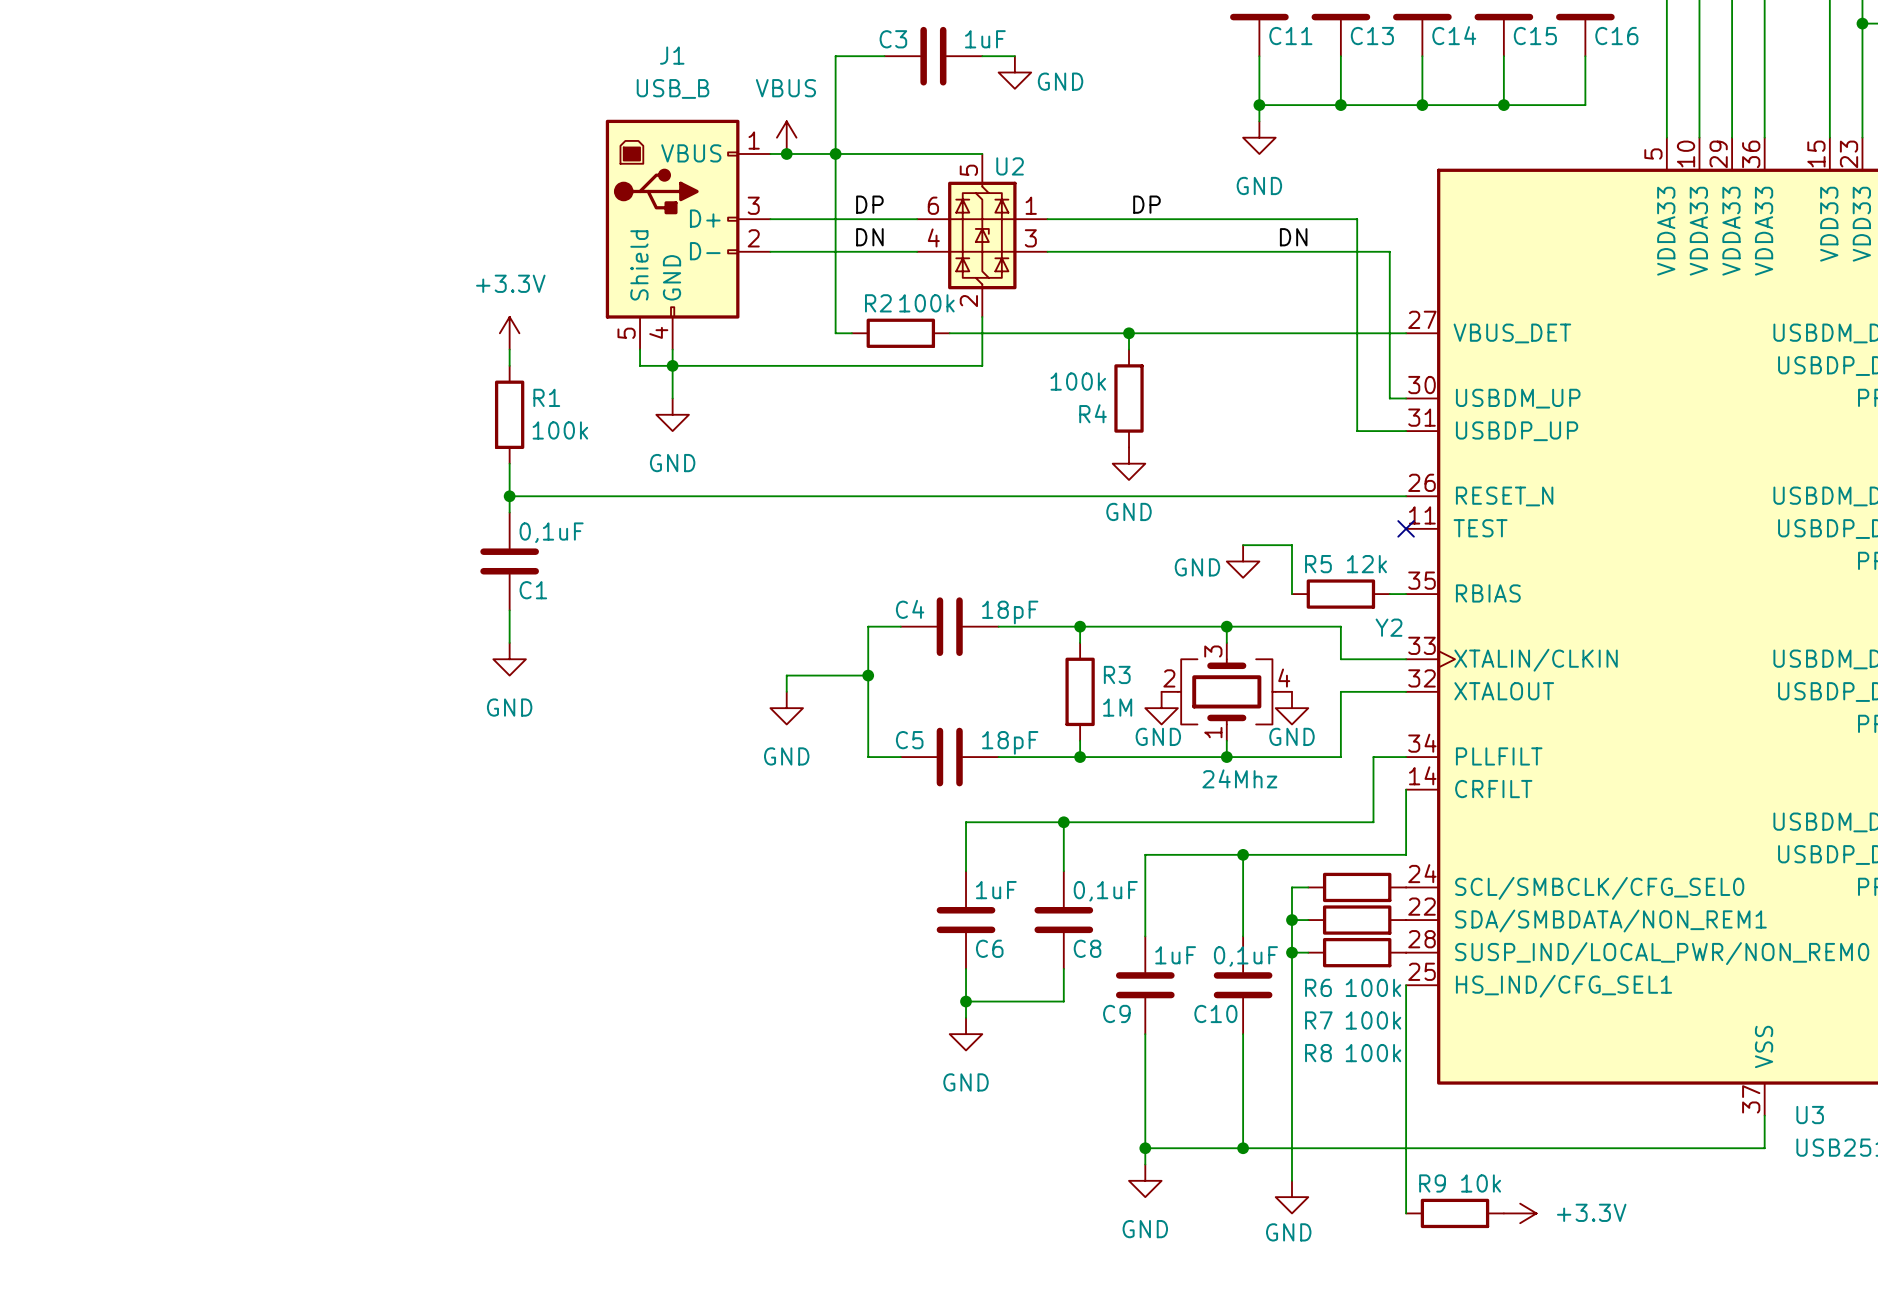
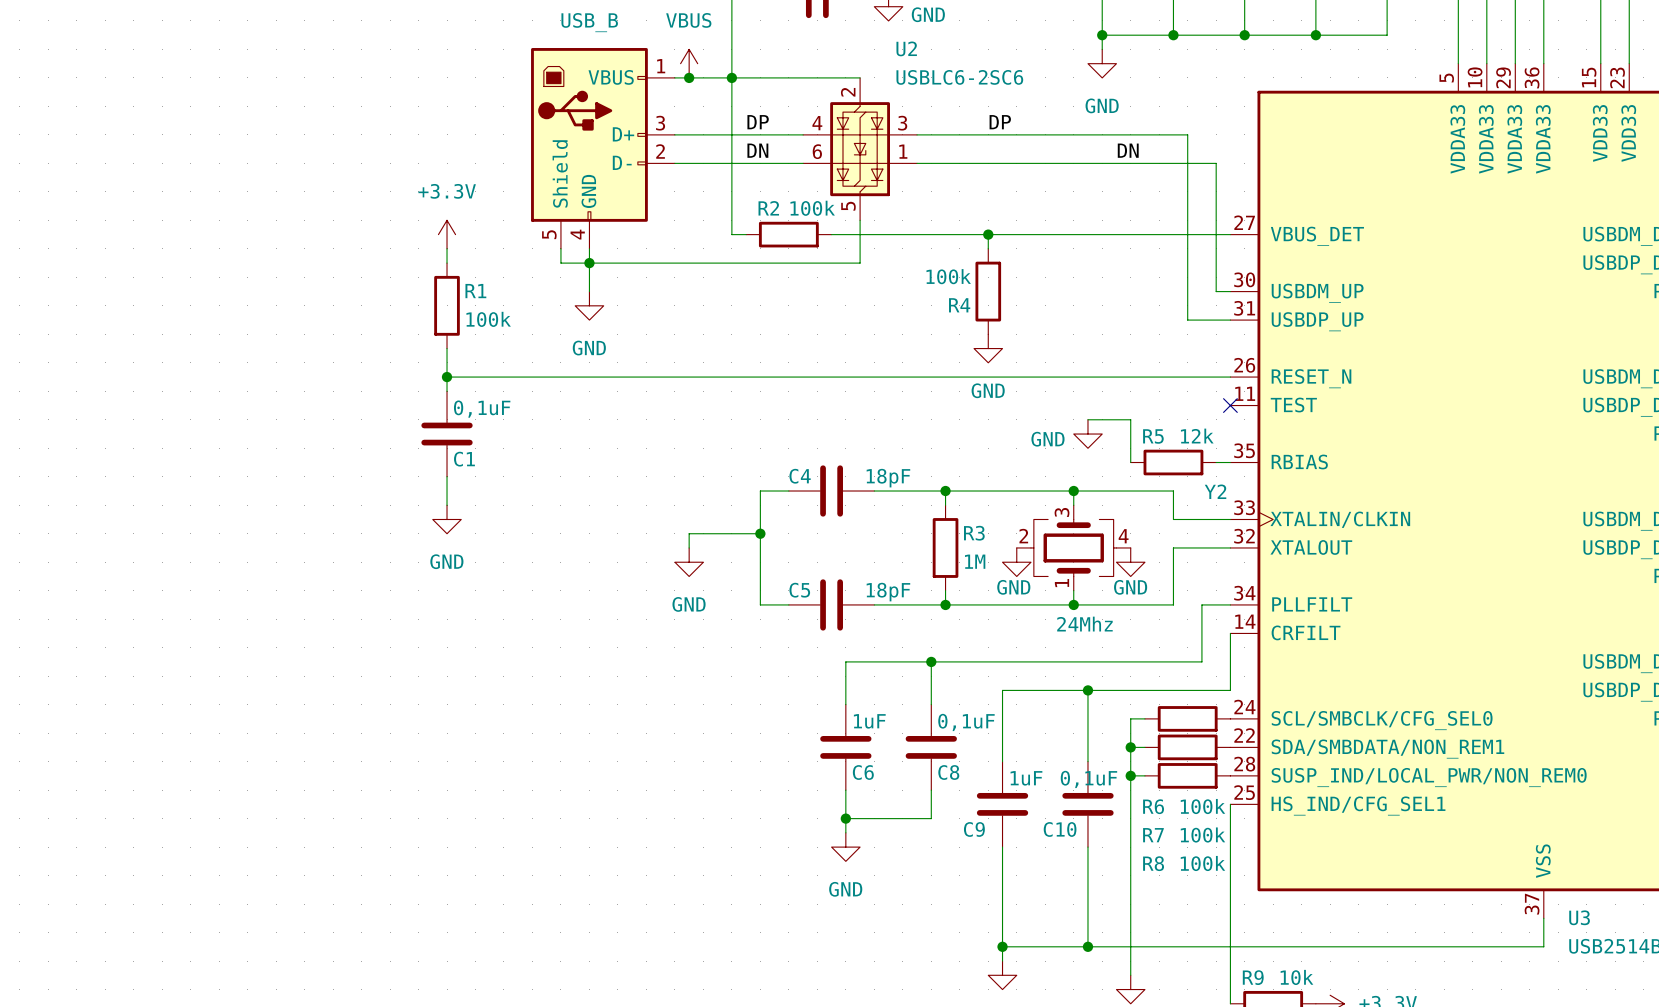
U2 value: none -> USBLC6-2SC6 (959, 77)
U2 name position: U2 (1010, 166) -> U2 (906, 48)
U2 flip: as is (982, 235) -> up-down (860, 149)

